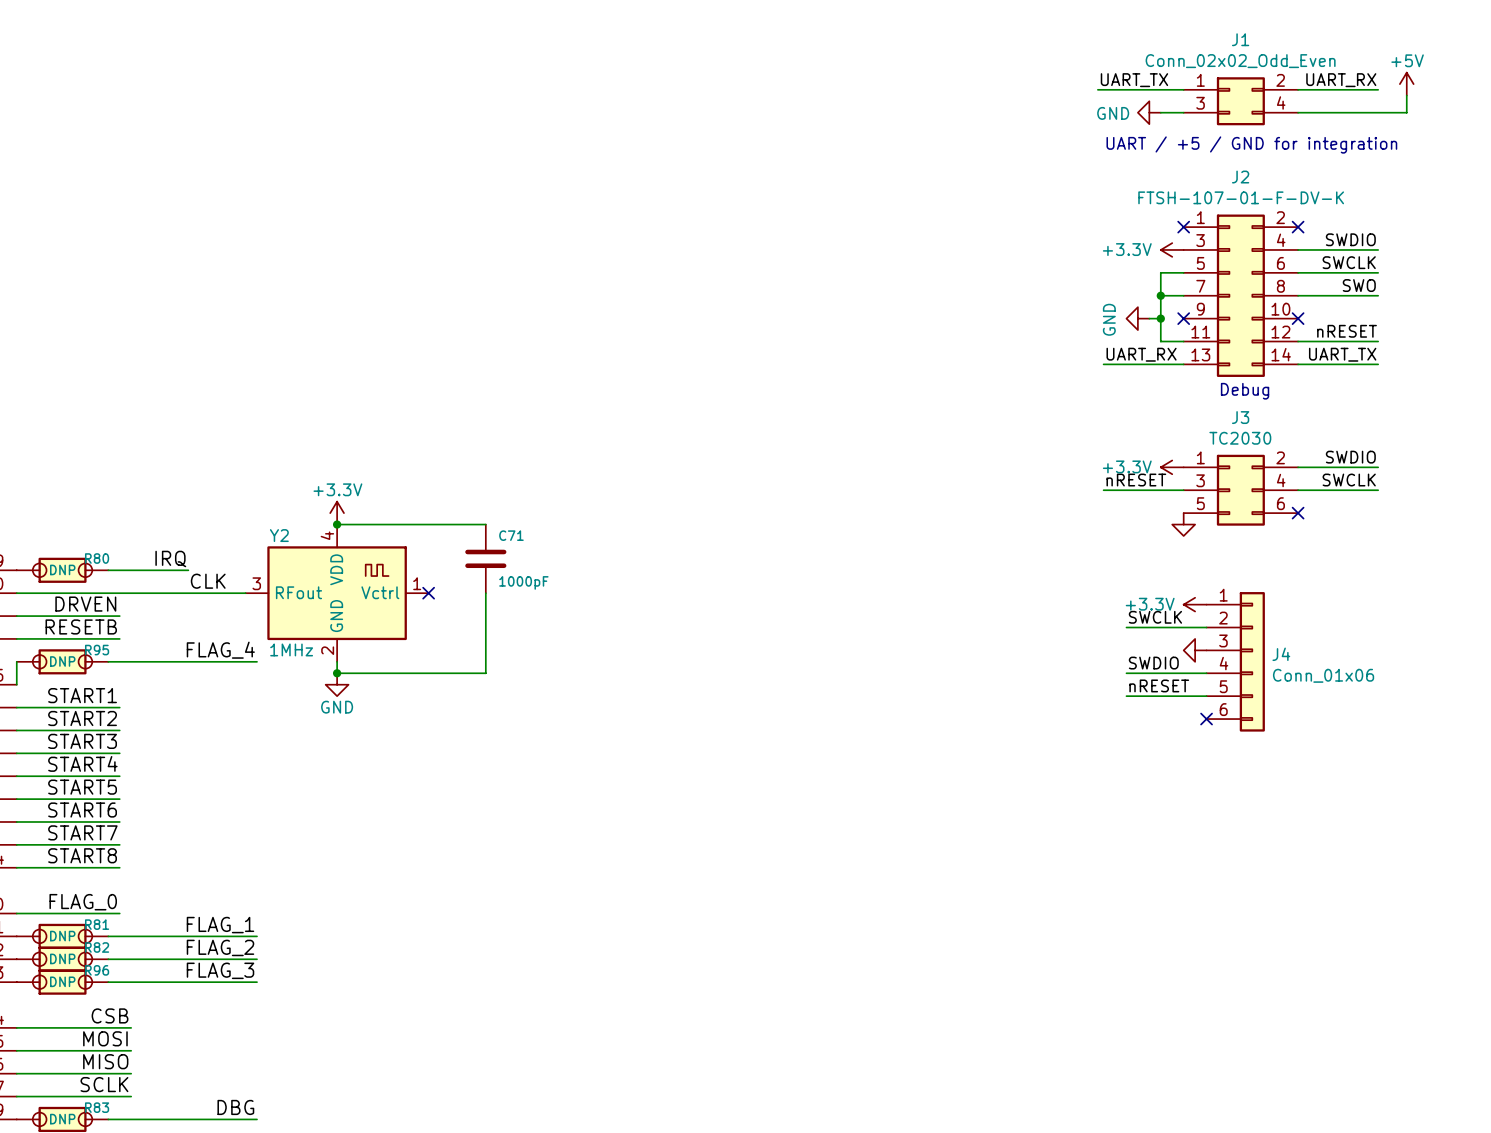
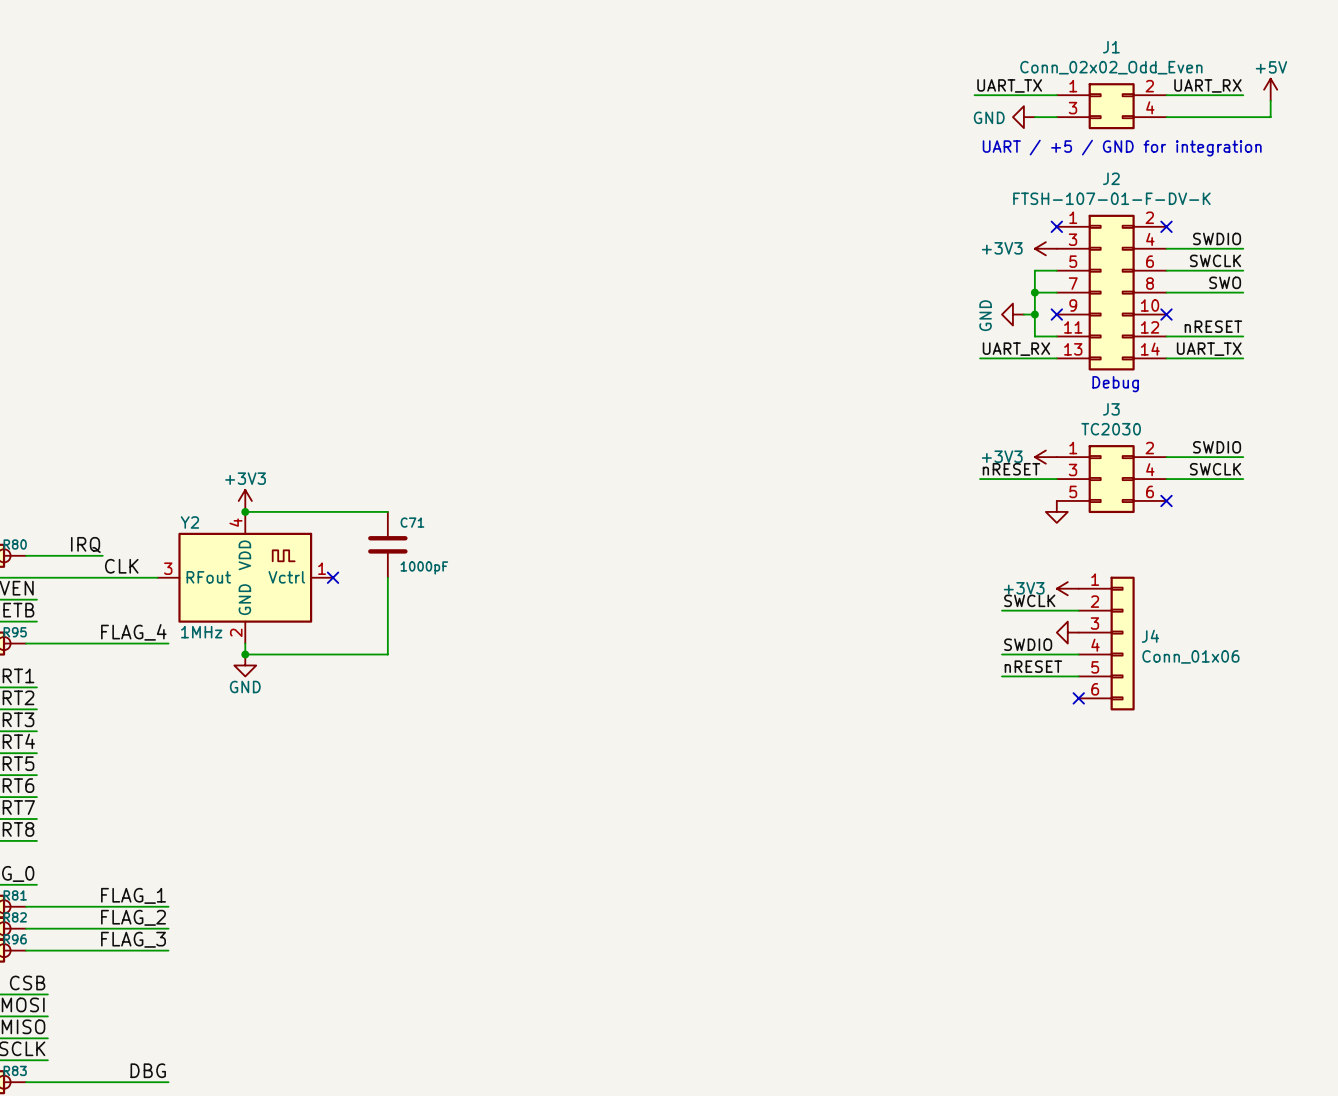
power symbol: +3.3V (1172, 249) -> +3V3 (1045, 248)
power symbol: +3.3V (1172, 467) -> +3V3 (1045, 457)
power symbol: +3.3V (337, 513) -> +3V3 (245, 500)
power symbol: +3.3V (1195, 604) -> +3V3 (1067, 588)

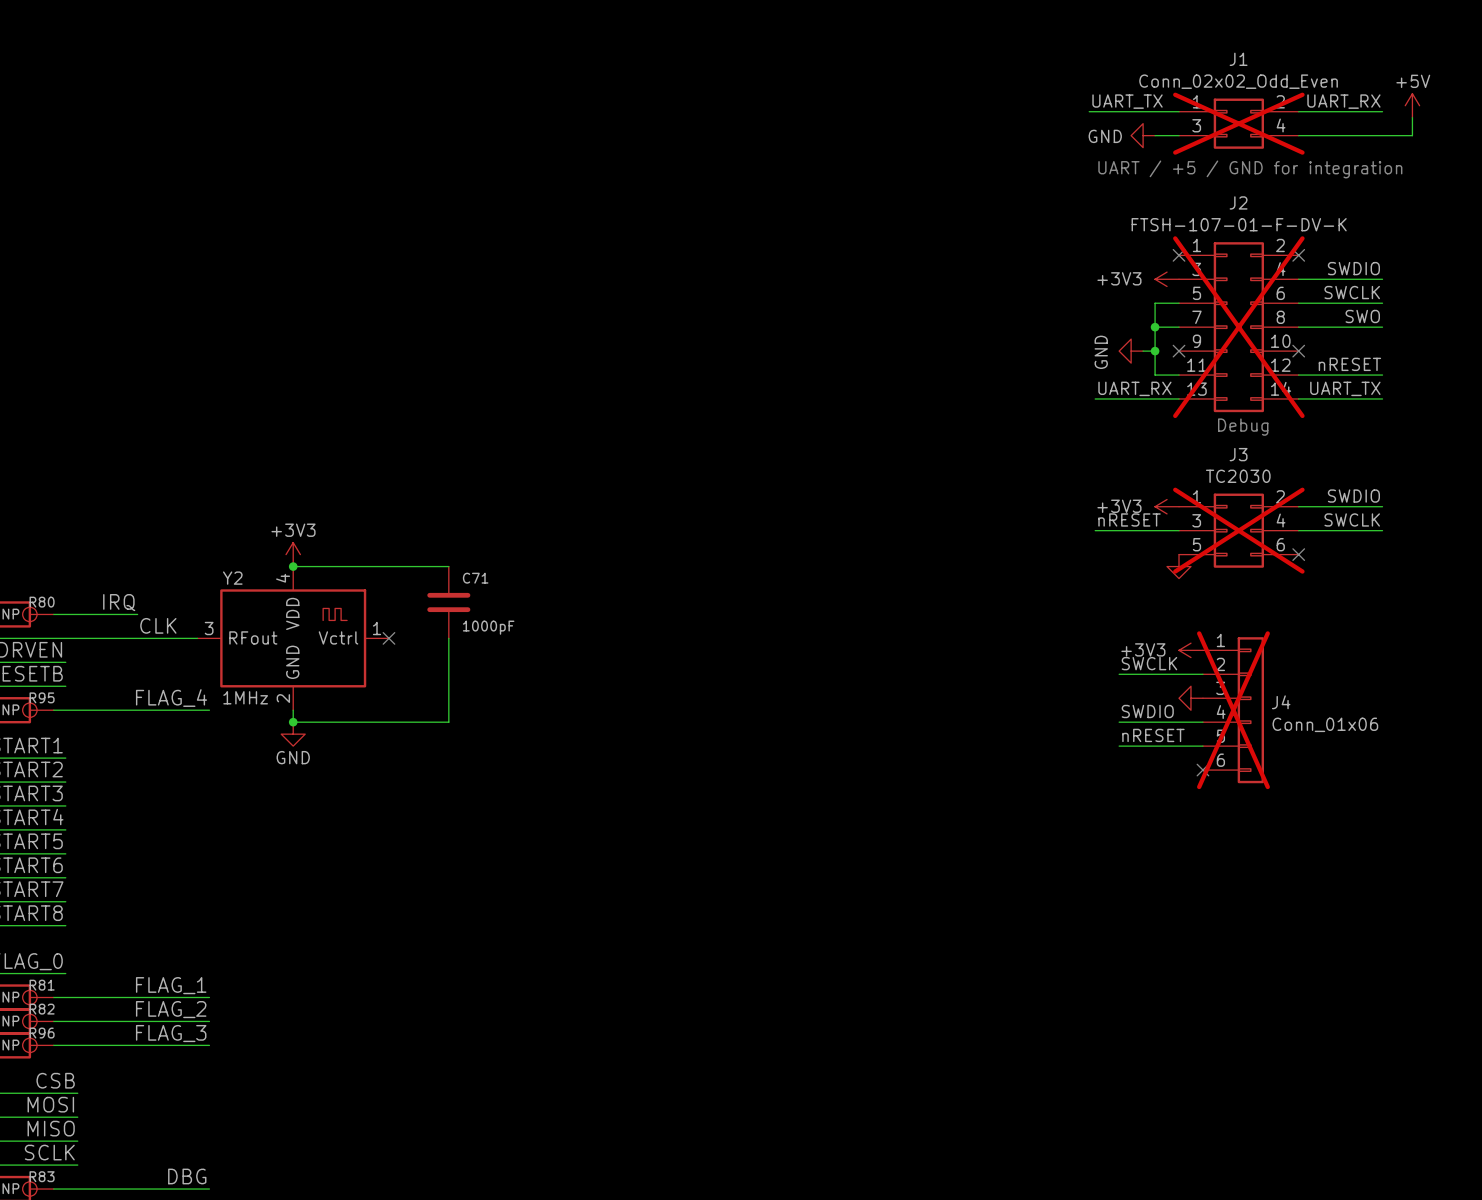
J1 do-not-place cross: none -> (1238, 123)
J2 do-not-place cross: none -> (1238, 327)
J3 do-not-place cross: none -> (1238, 530)
J4 do-not-place cross: none -> (1233, 710)

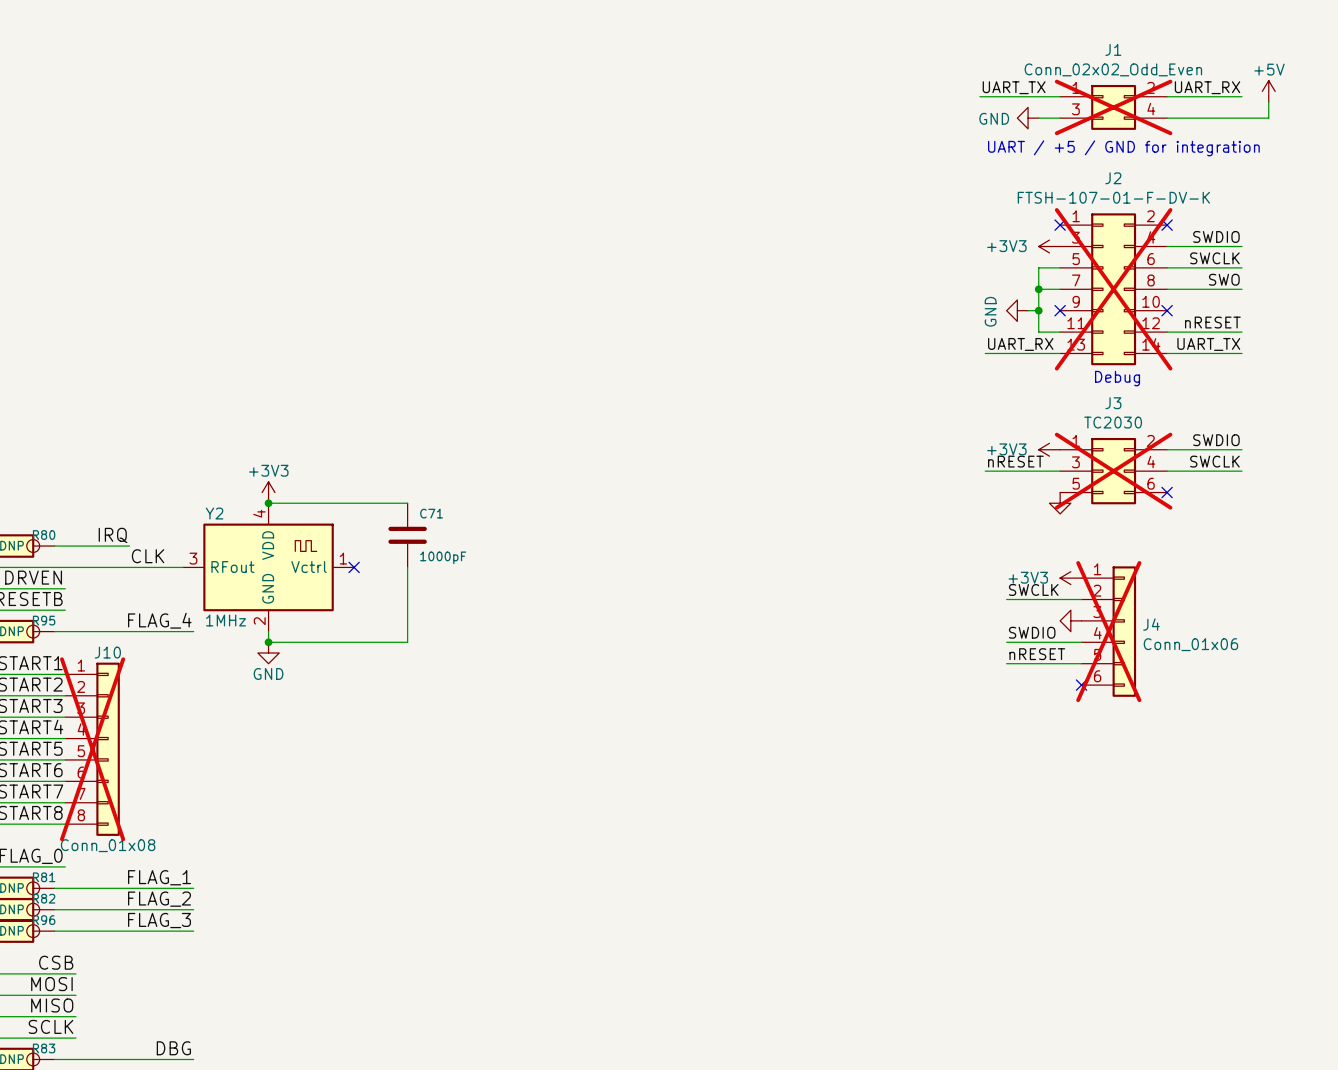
J10: none -> Conn_01x08 (92, 749)

